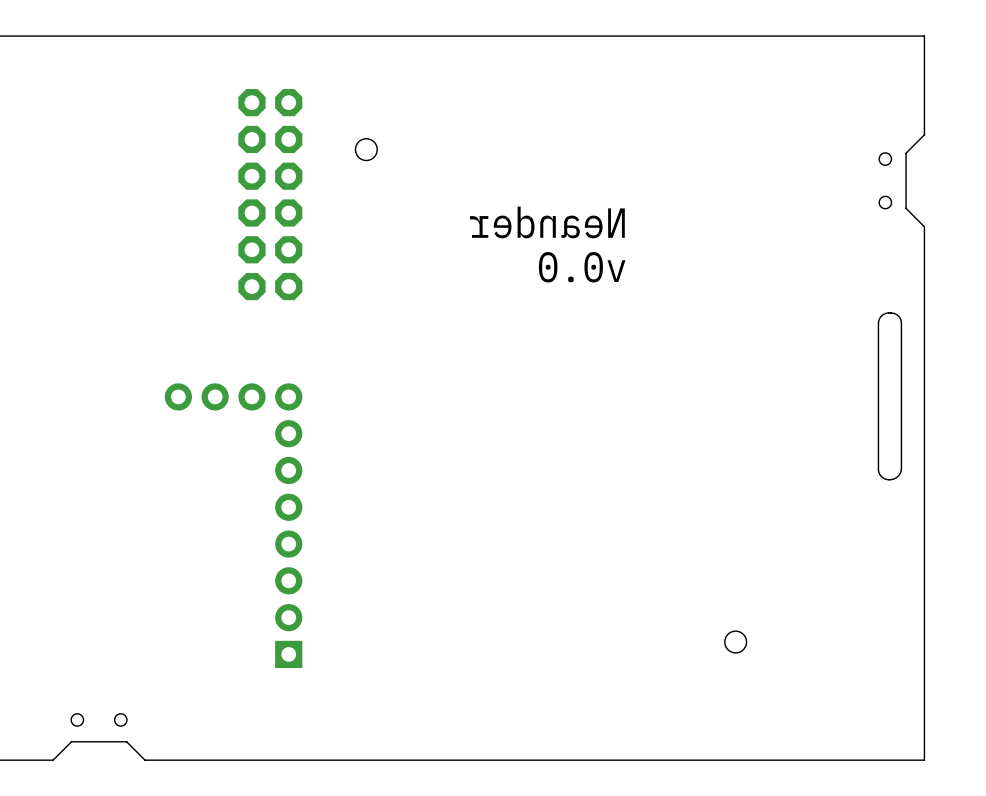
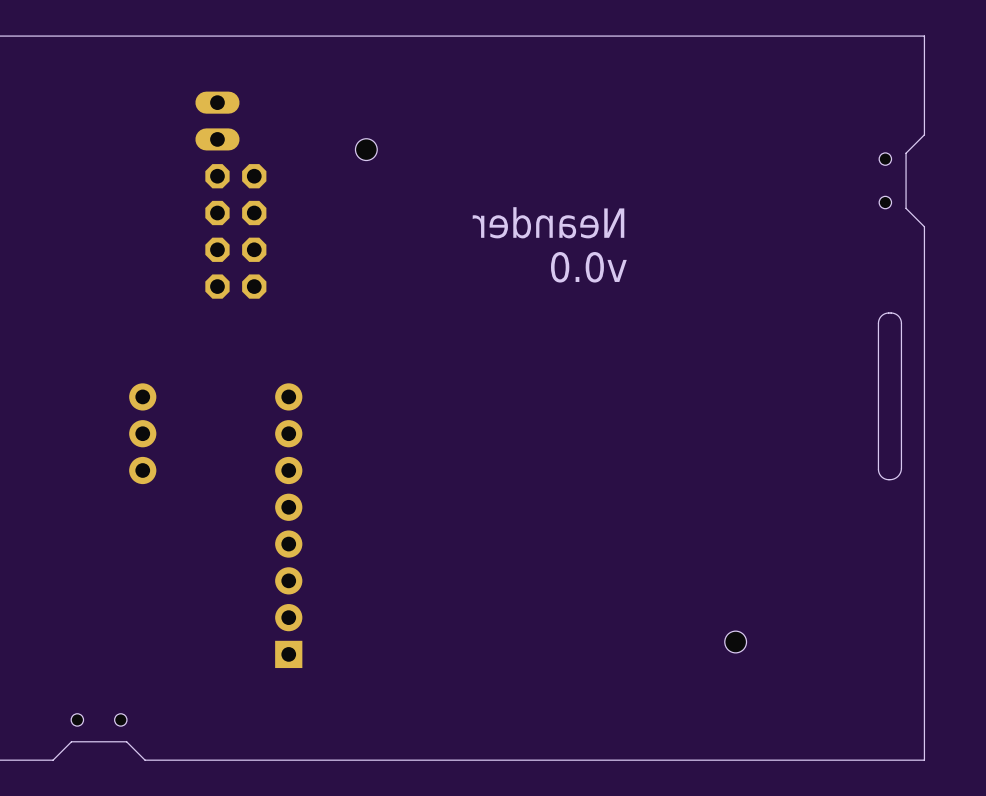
part: none -> (217, 121)
part: (270, 194) -> none
part: none -> (235, 231)
part rotation: 0° (215, 396) -> 90° clockwise (142, 433)
part position: (215, 396) -> (142, 433)

